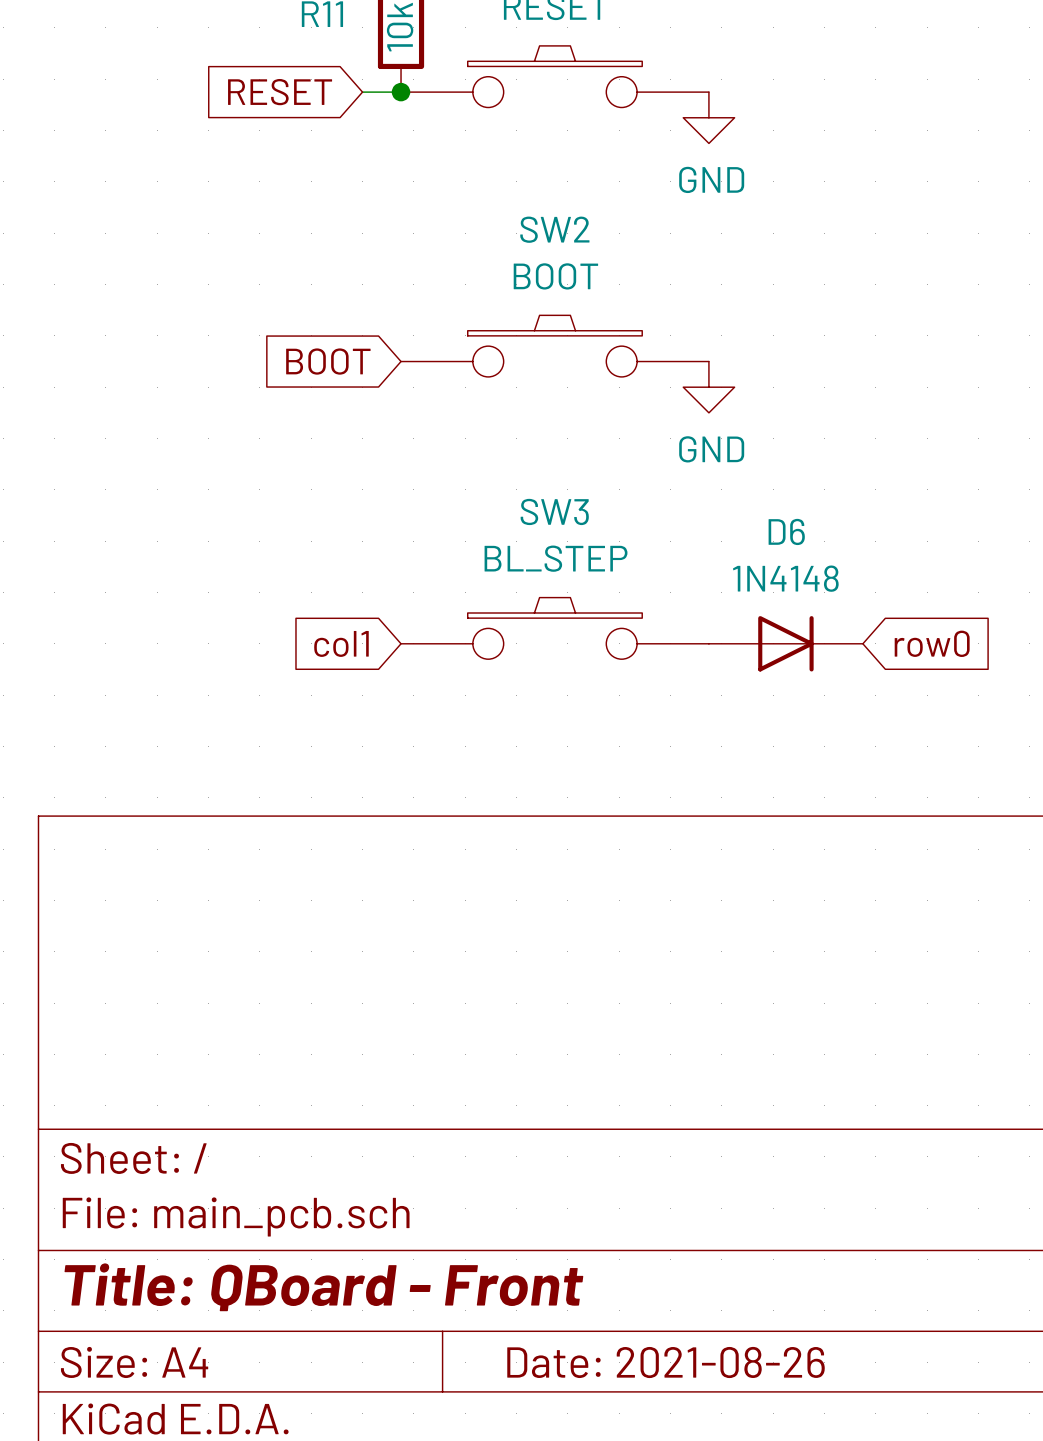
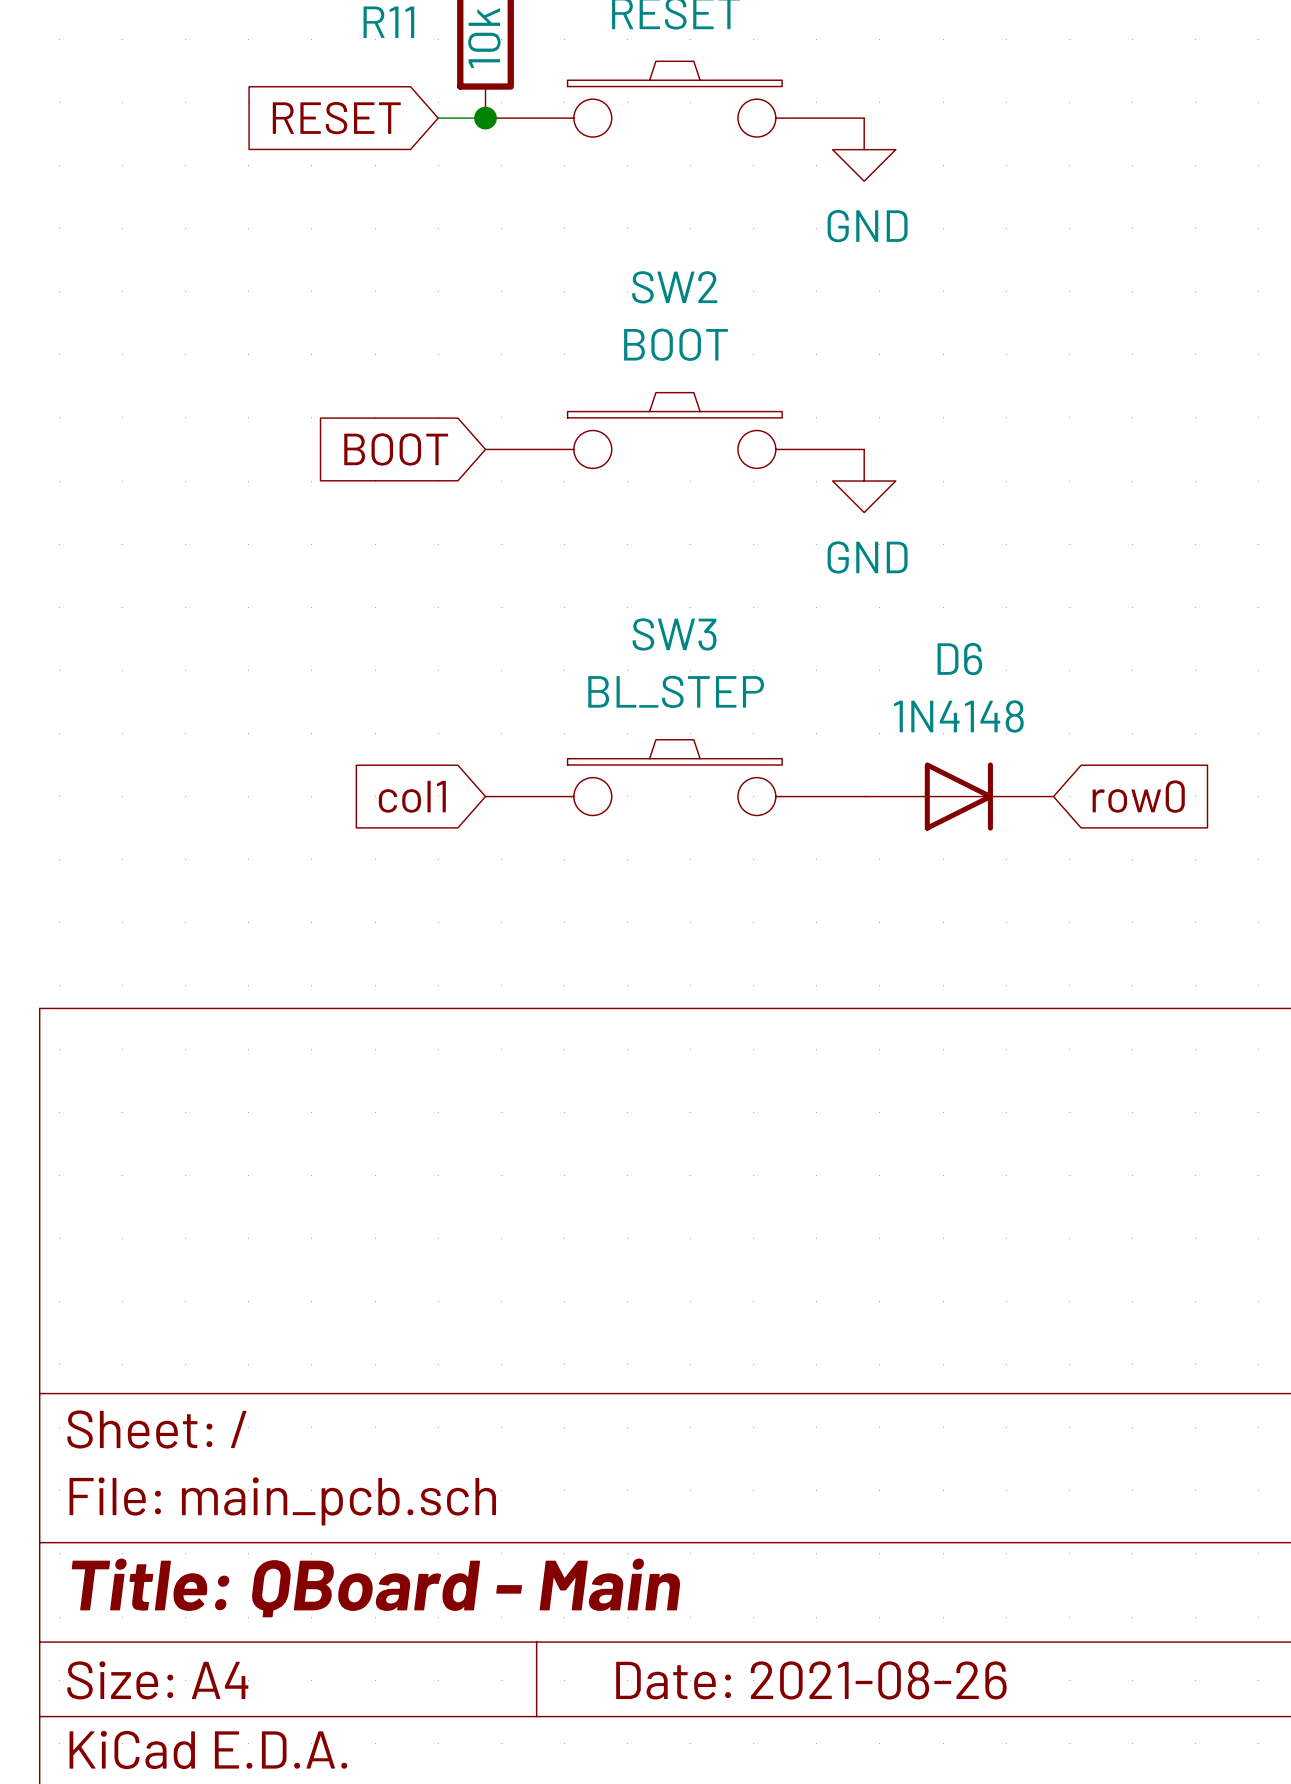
title block: Title: QBoard - Front (323, 1287) -> Title: QBoard - Main (376, 1587)

